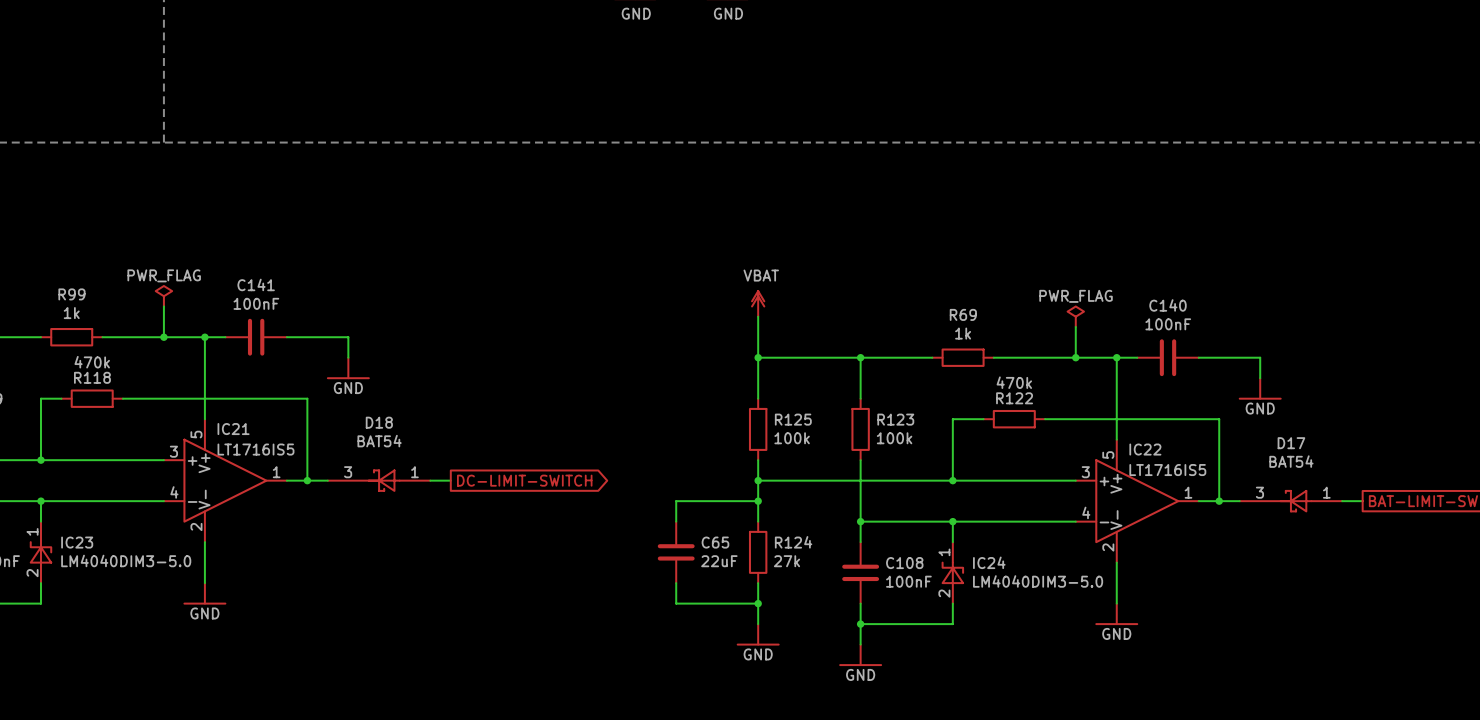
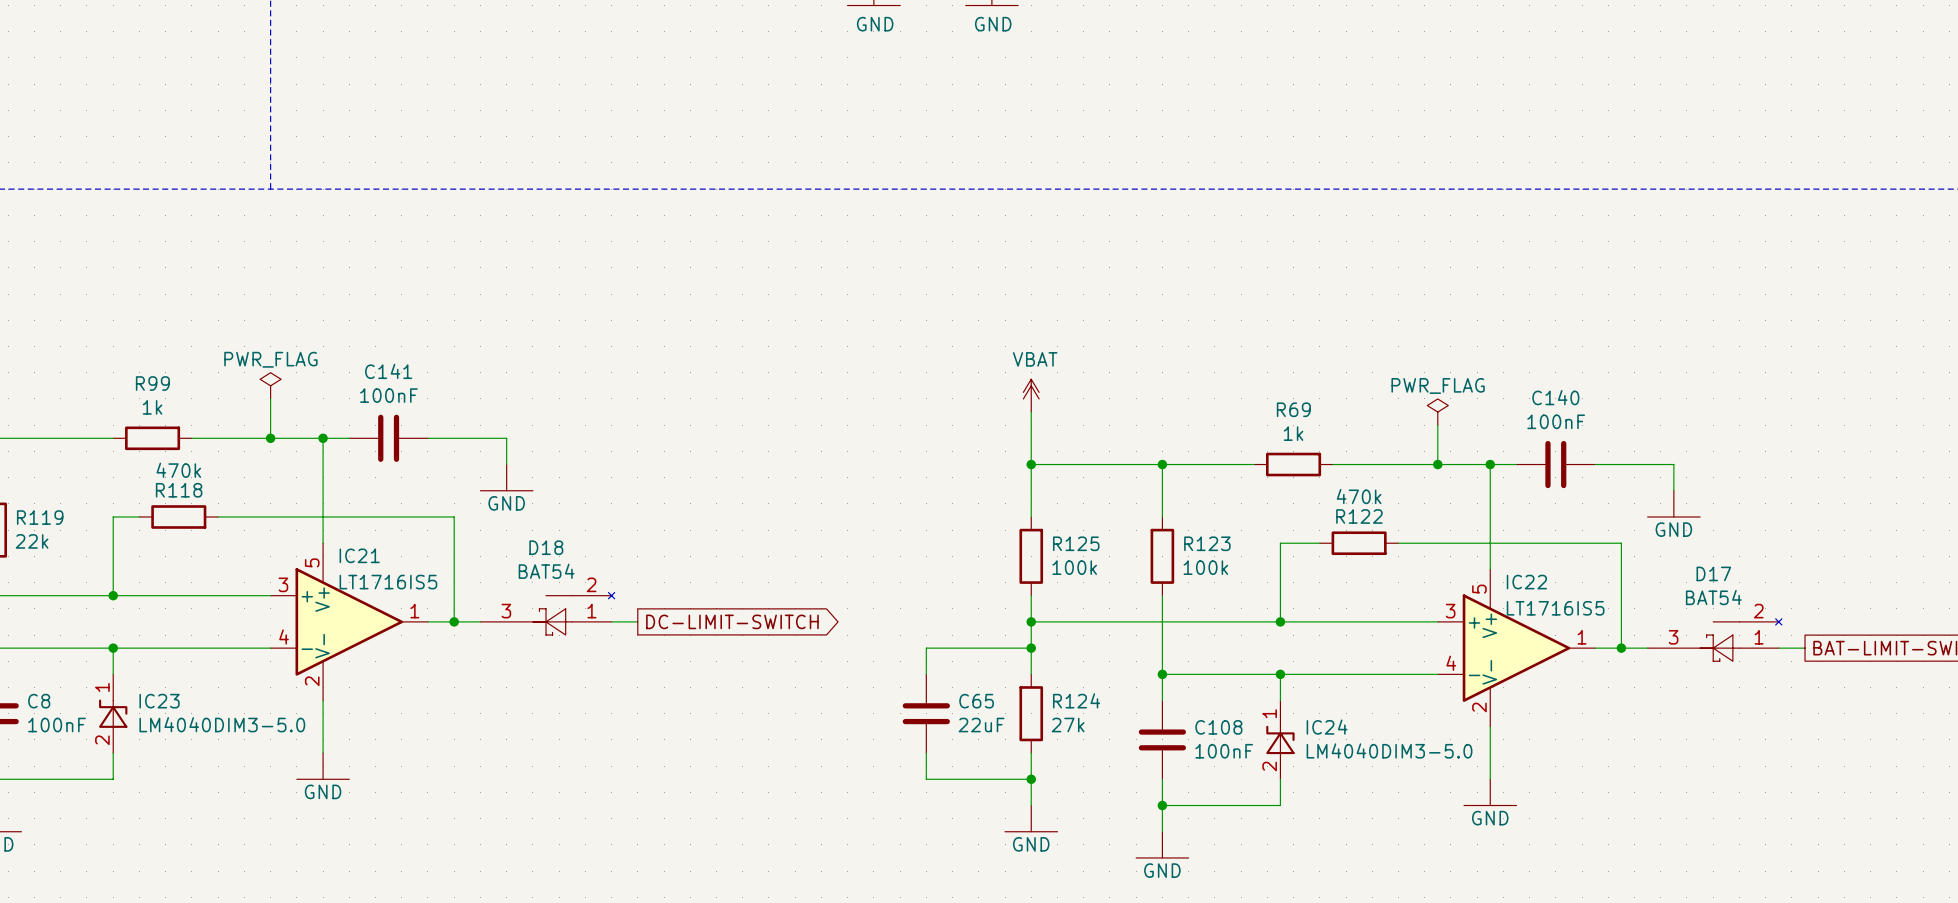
D18 symbol: [327, 470, 431, 491] -> [480, 592, 615, 636]
D17 symbol: [1239, 490, 1343, 512] -> [1647, 618, 1782, 662]

